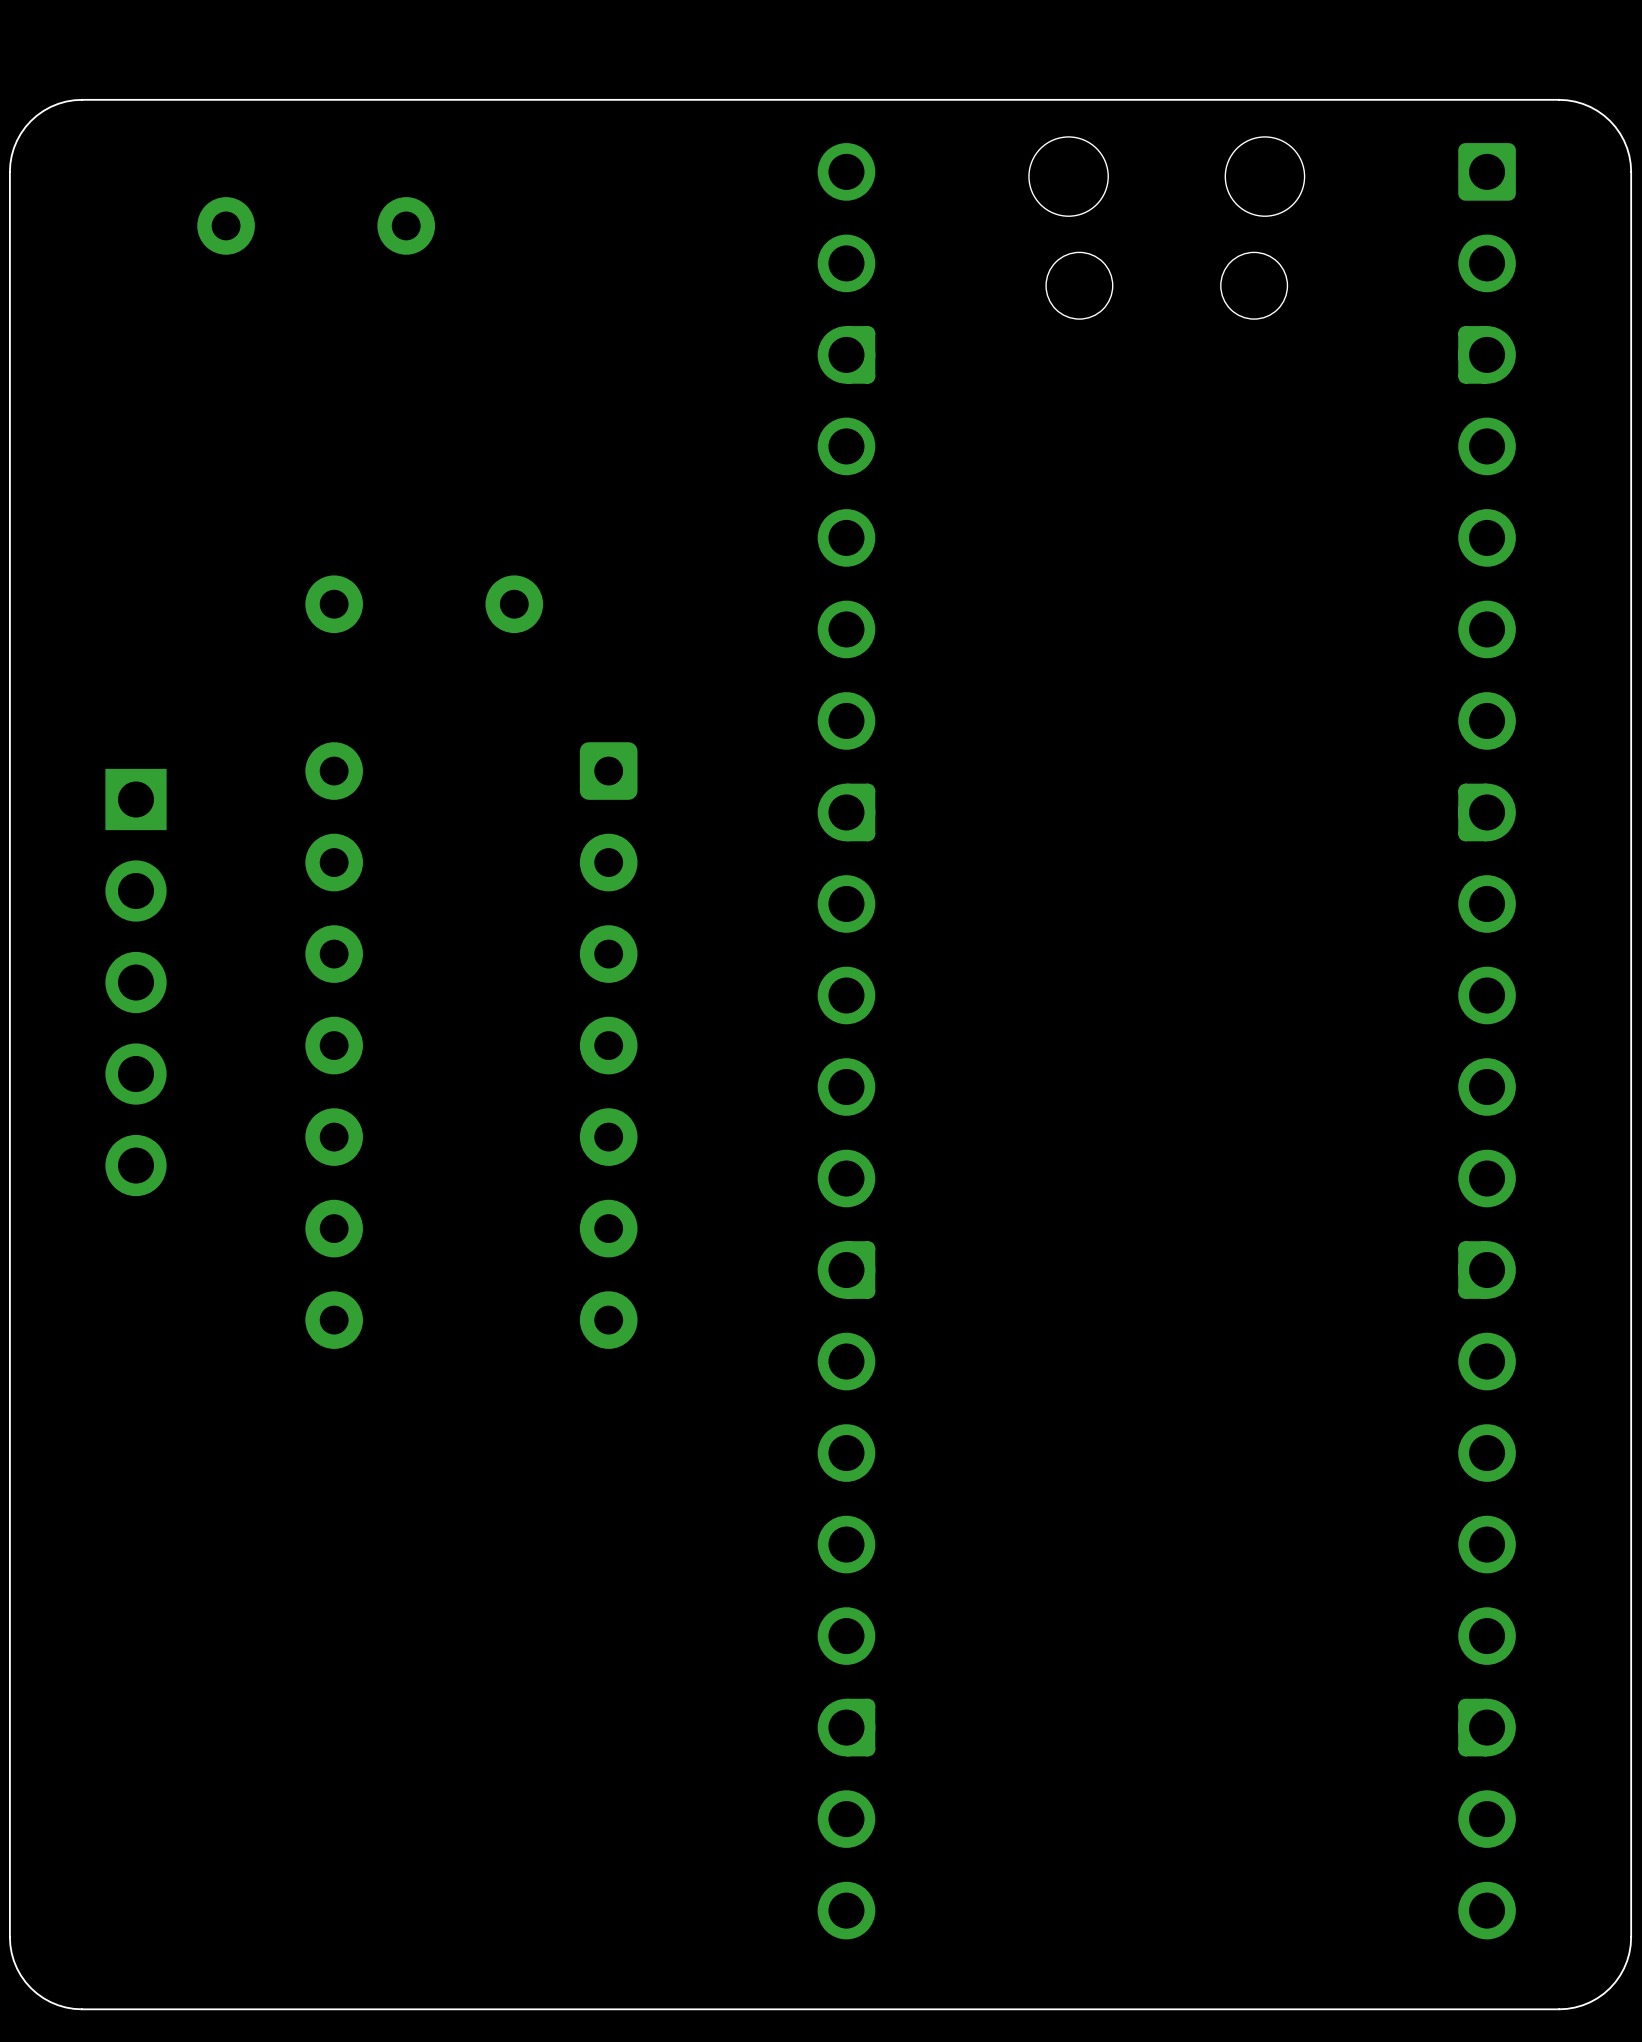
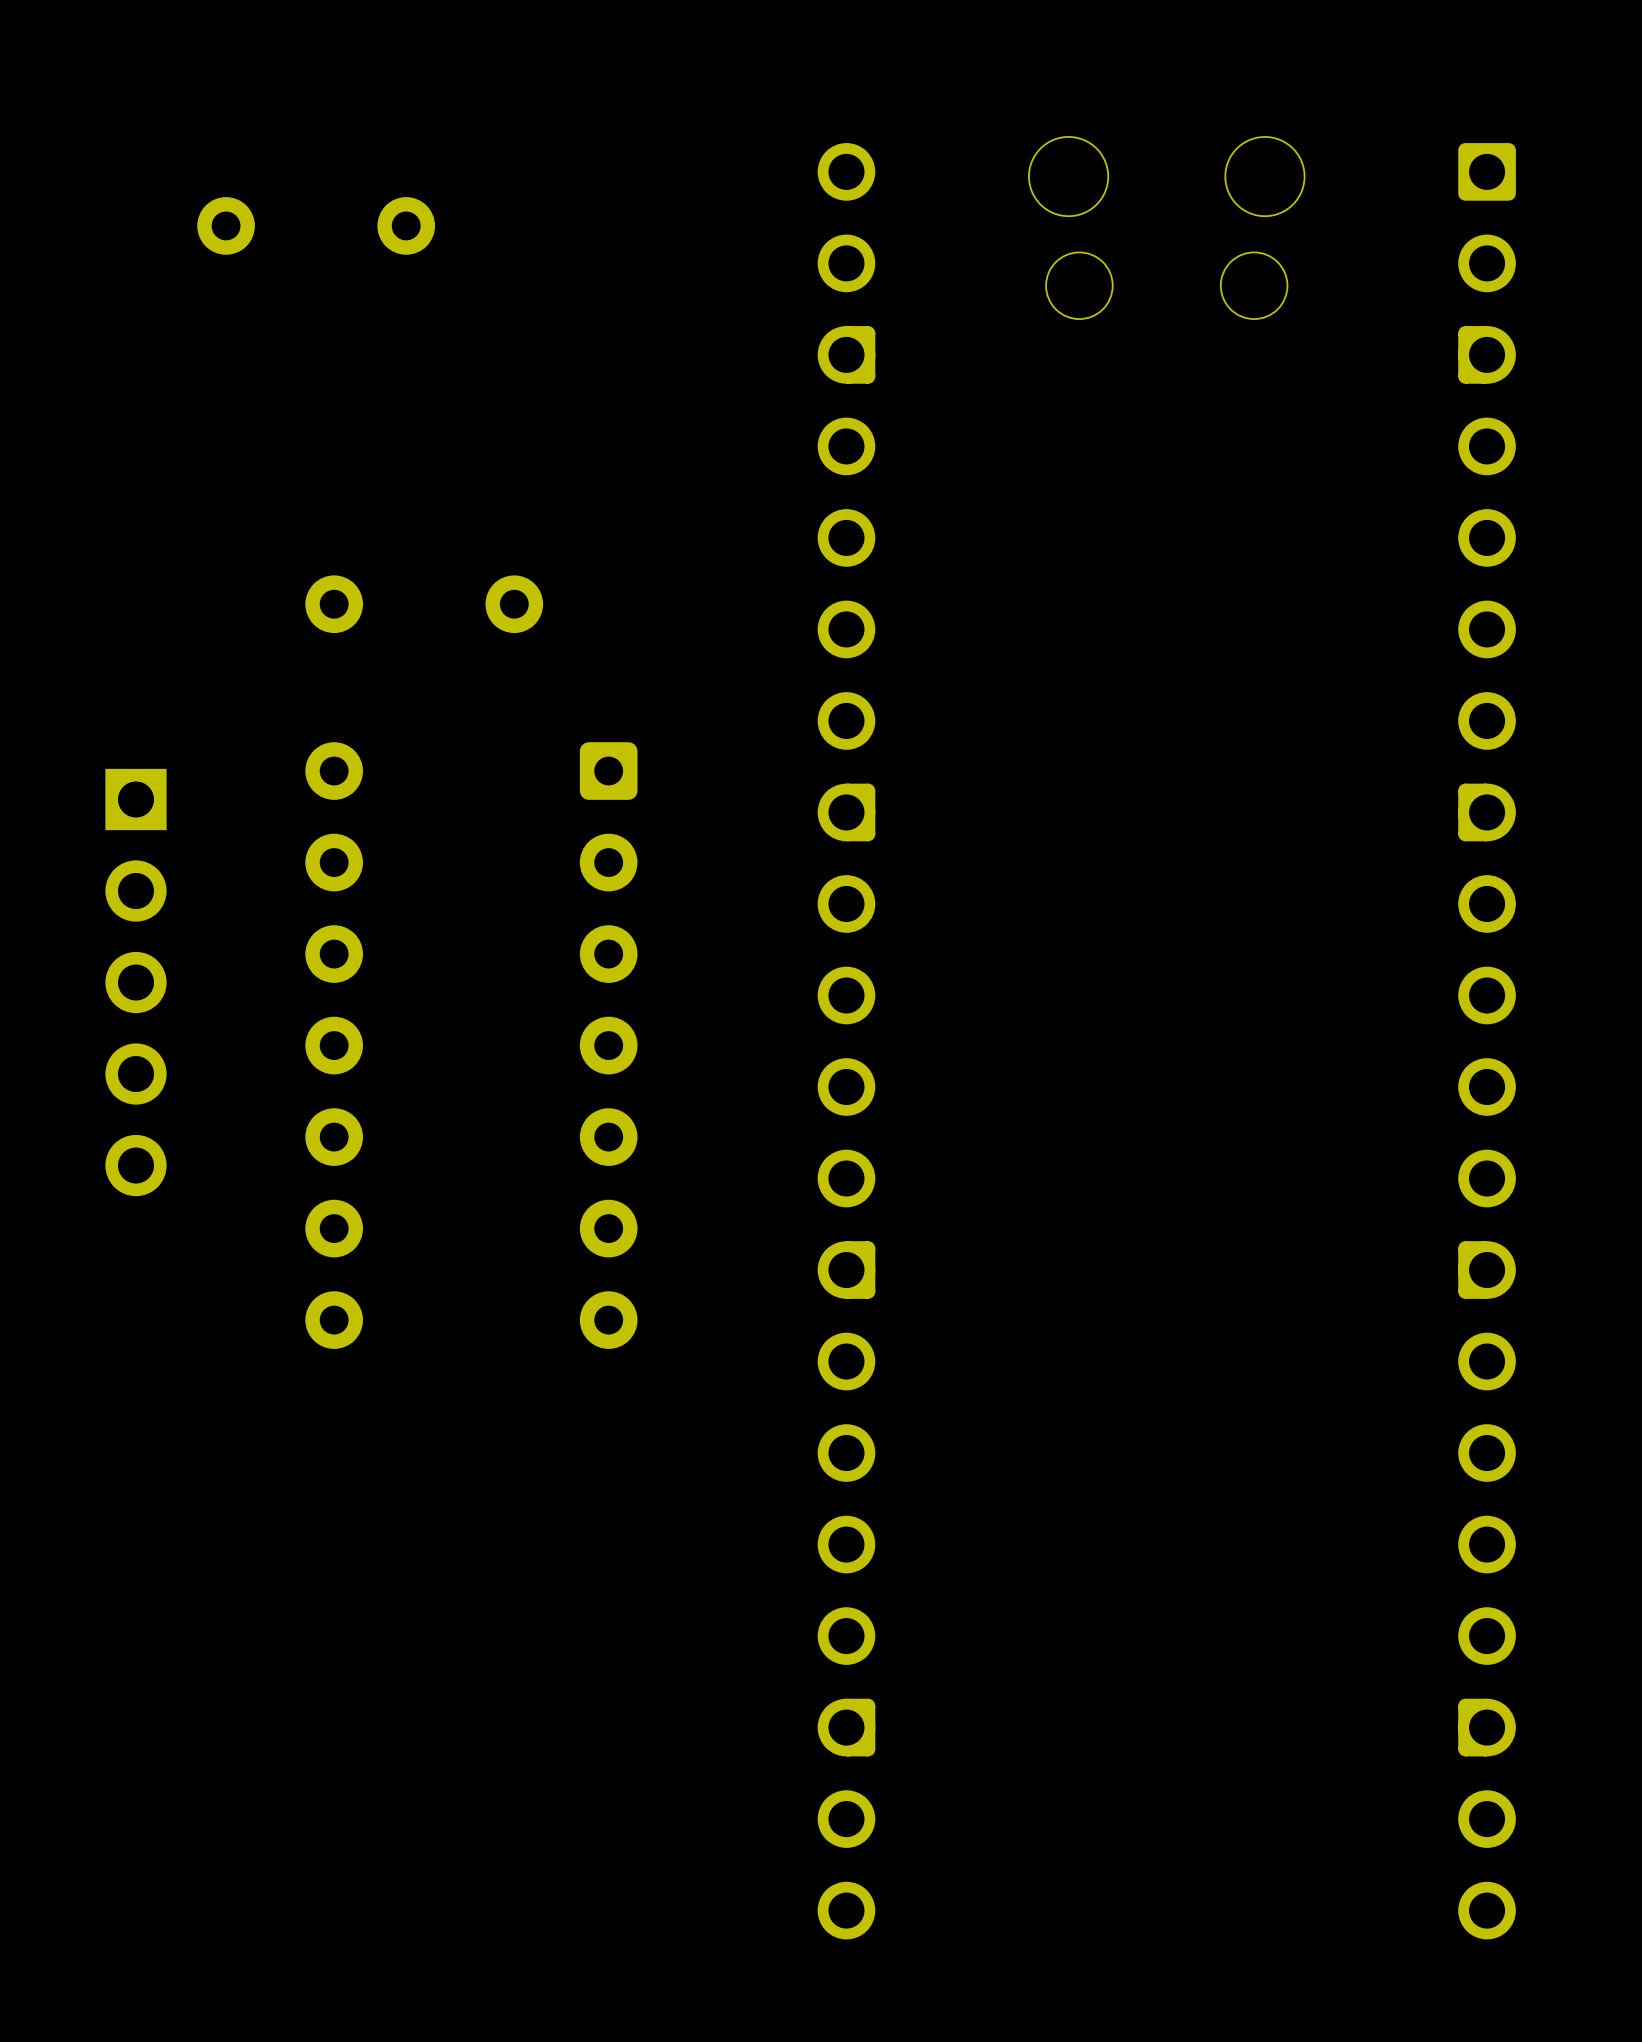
board edge: (1559, 99) (81, 99) (65, 101) (50, 106) (37, 115) (25, 126) (13, 148) (9, 171) (9, 1937) (11, 1953) (17, 1968) (25, 1982) (37, 1993) (58, 2005) (81, 2009) (1559, 2009) (1575, 2007) (1590, 2002) (1604, 1993) (1615, 1982) (1627, 1961) (1631, 1937) (1631, 171) (1627, 148) (1620, 133) (1610, 120) (1590, 106) (1575, 101) (1559, 99) -> none

